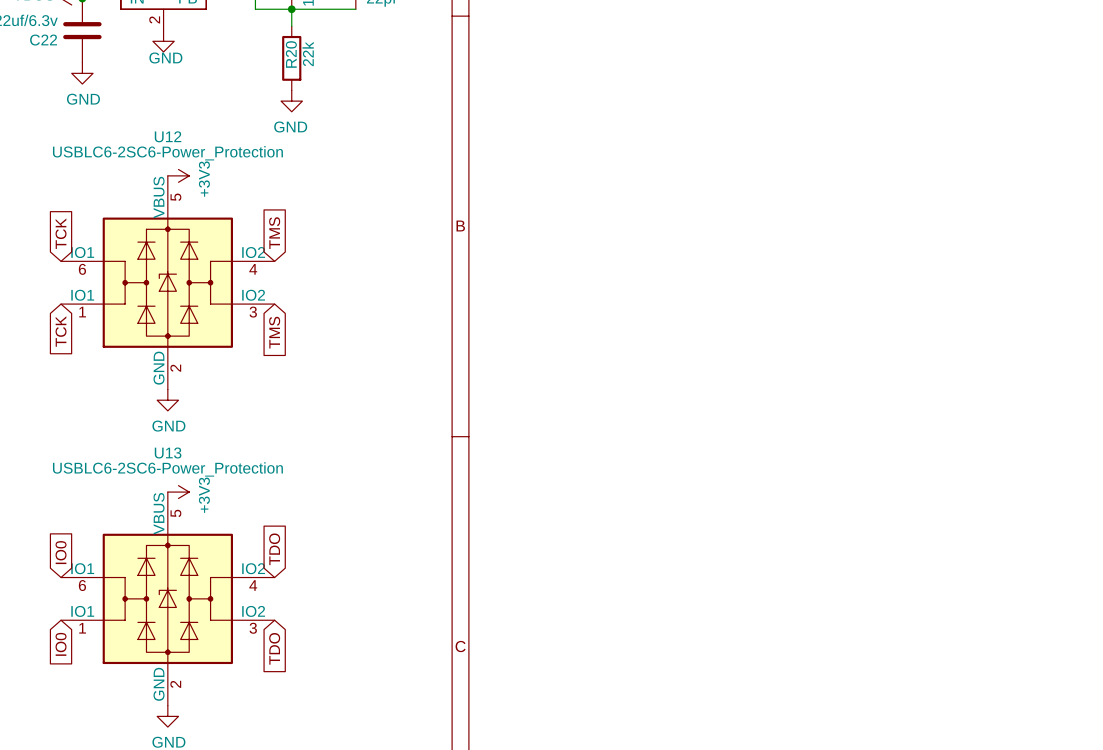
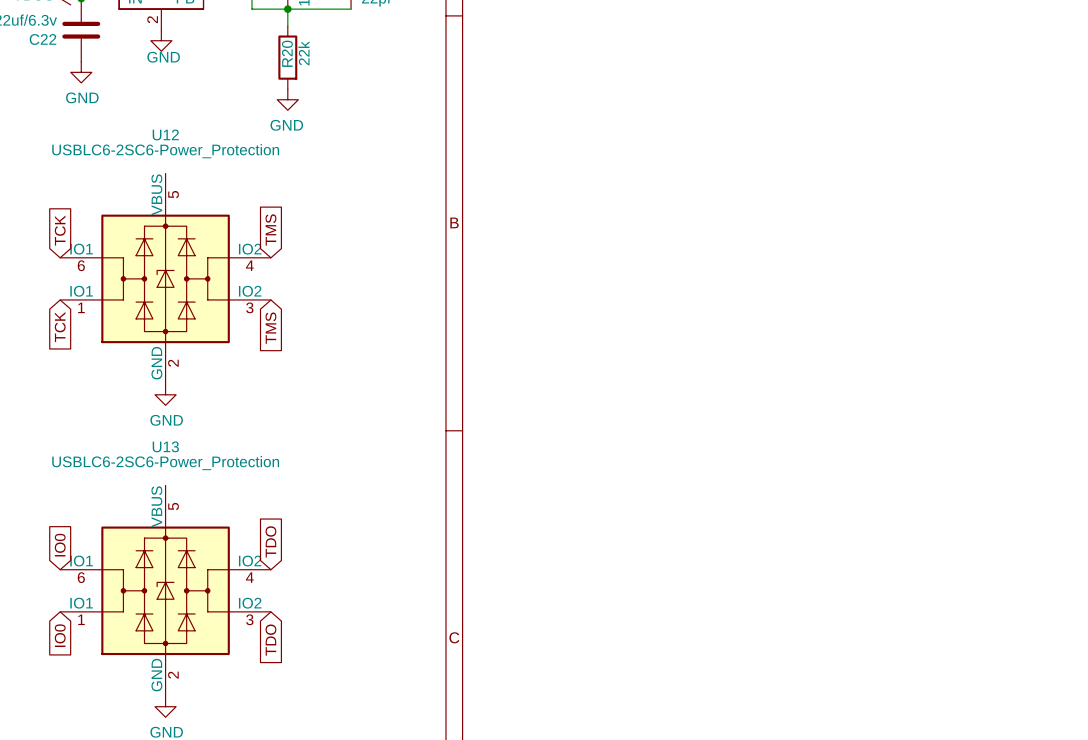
power symbol: +3V3 (178, 175) -> none
power symbol: +3V3 (178, 492) -> none

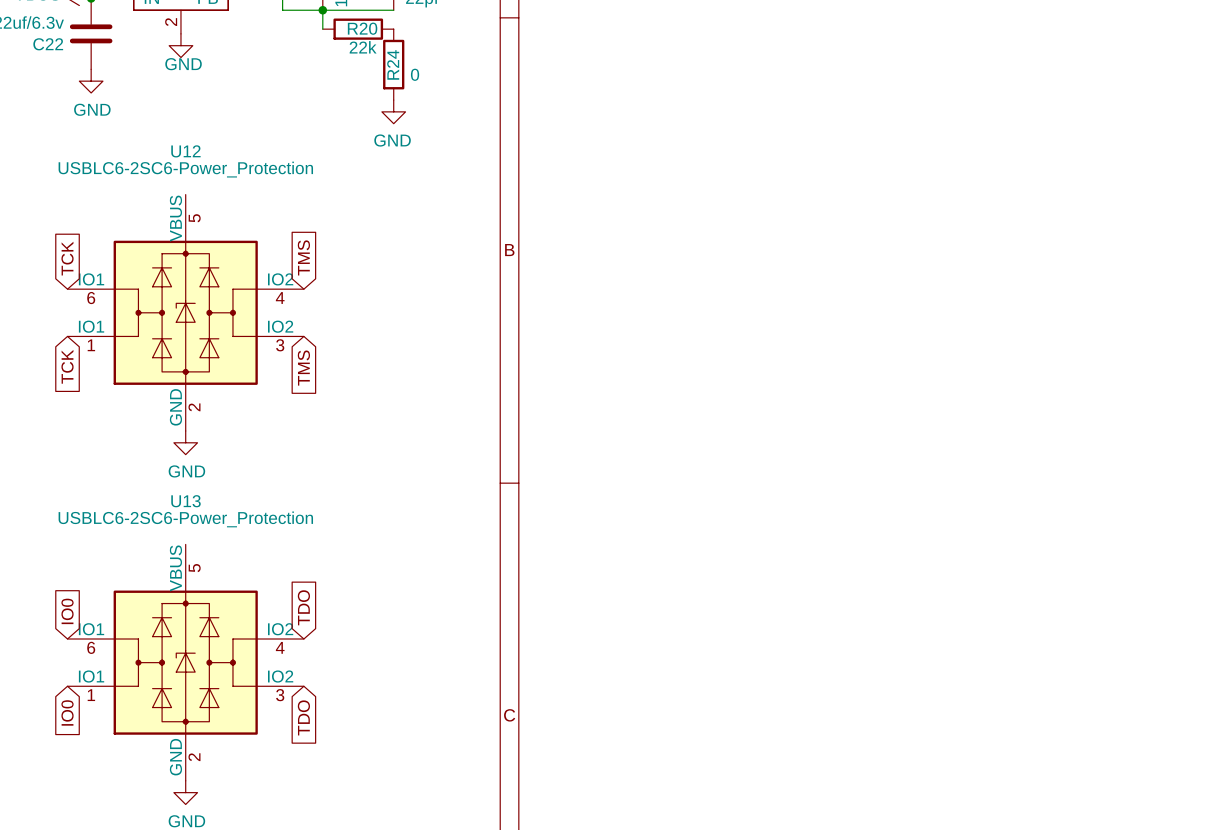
R20 rotation: 0° (287, 57) -> 90° clockwise (358, 29)
R20 position: (287, 57) -> (358, 29)
R24: none -> 0 (393, 64)
power symbol position: GND (287, 99) -> GND (393, 111)

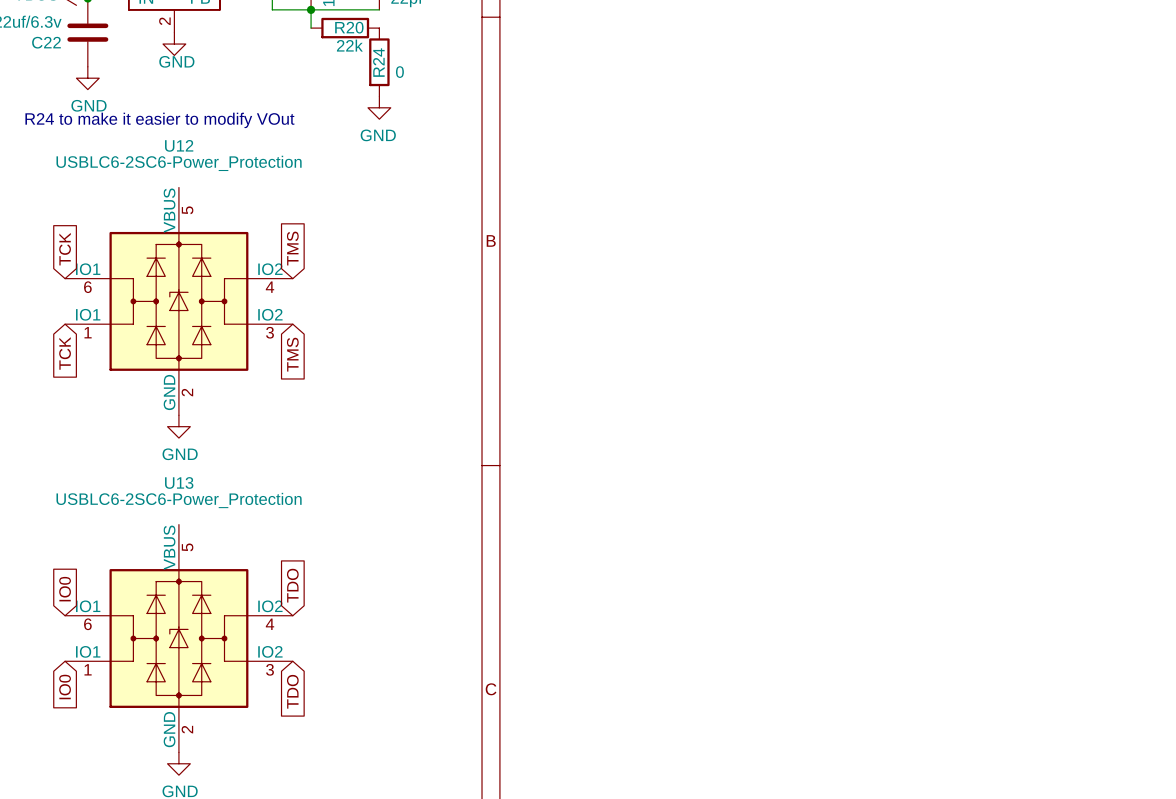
text: none -> R24 to make it easier to modify VOut (159, 120)

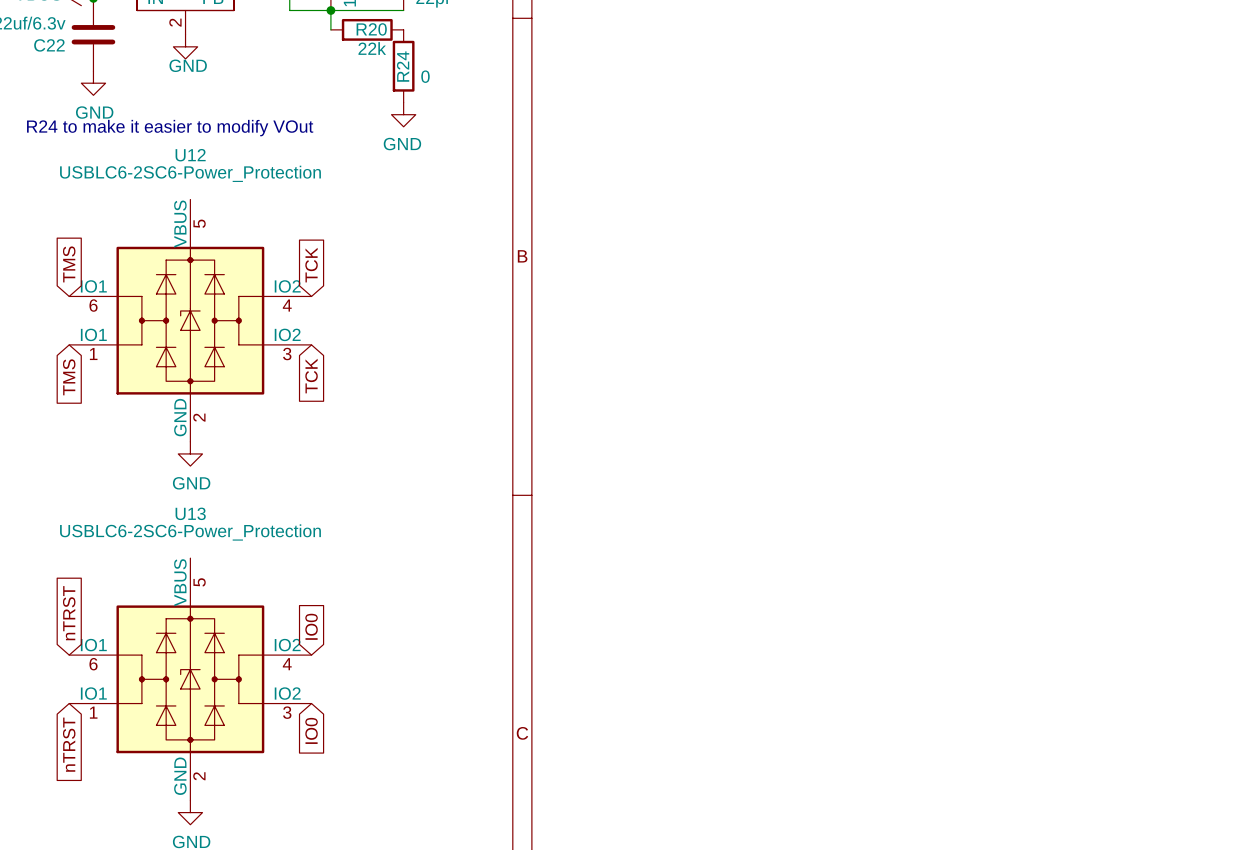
global label: TMS (292, 248) -> TCK (311, 265)
global label: TCK (65, 249) -> TMS (69, 264)
global label: TCK (65, 353) -> TMS (69, 377)
global label: TMS (292, 354) -> TCK (311, 376)
global label: TDO (292, 585) -> IO0 (311, 626)
global label: IO0 (65, 589) -> nTRST (69, 613)
global label: IO0 (65, 687) -> nTRST (69, 744)
global label: TDO (292, 691) -> IO0 (311, 730)

